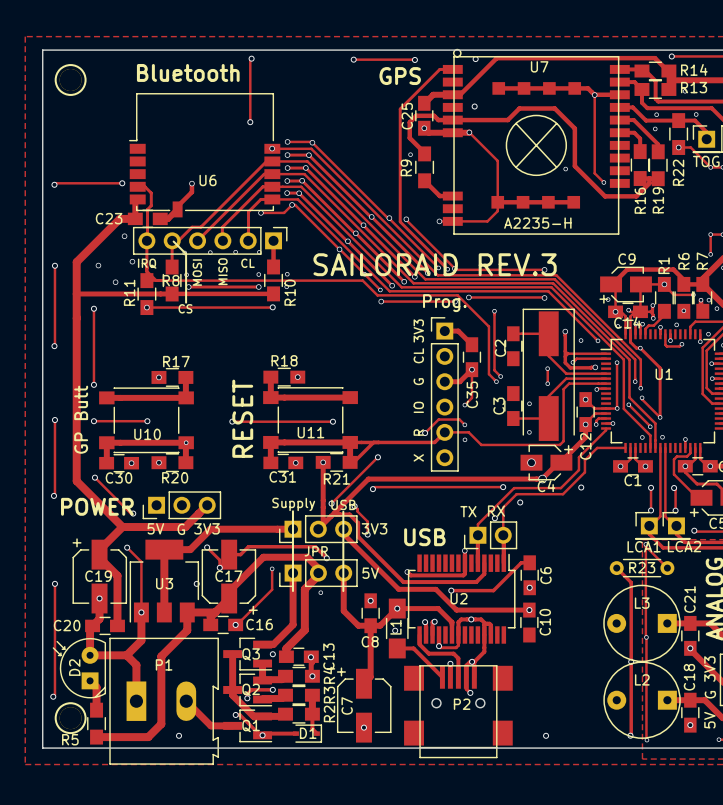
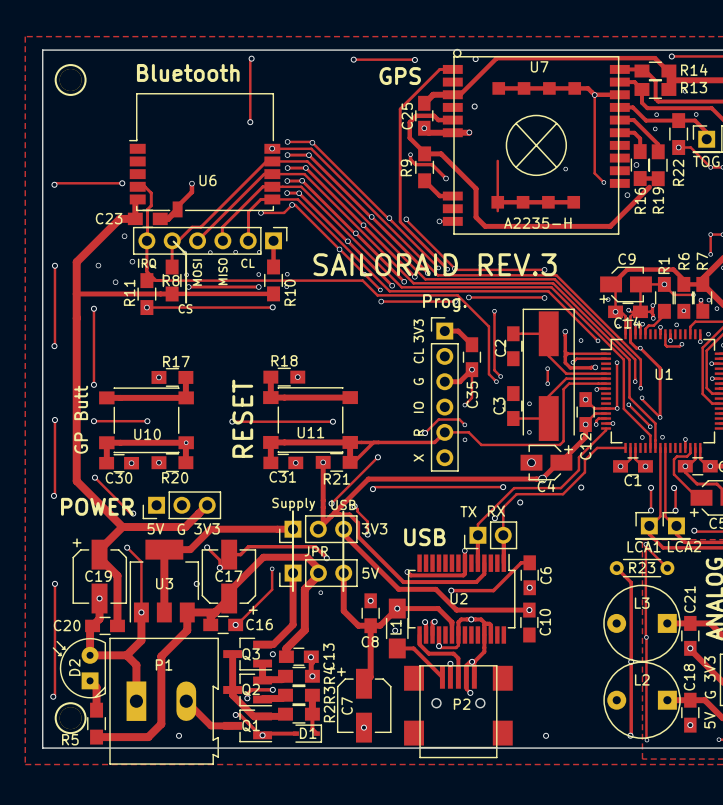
track: (452, 120) (507, 120) (519, 108) (554, 108) (574, 128) (574, 166) (605, 196) (636, 196) (649, 183) (649, 178) -> none
track: (469, 132) (497, 160) -> none
track: none -> (424, 153) (441, 153) (476, 188) (476, 217) (485, 226) (610, 226) (649, 187)
track: none -> (410, 154) (410, 159) (415, 164) (432, 164) (446, 178)
via: none -> (636, 164)
via: none -> (446, 178)
via: none -> (627, 195)
track: (497, 211) (487, 221) (452, 221) -> none

